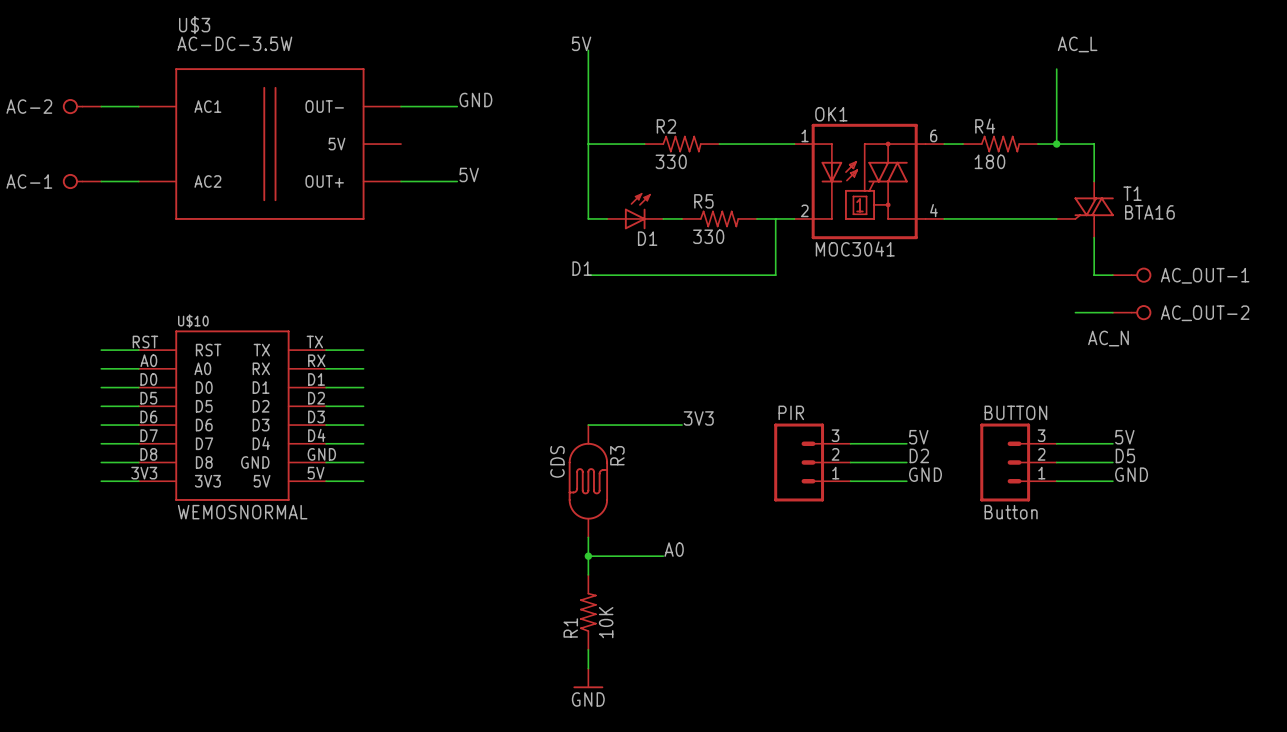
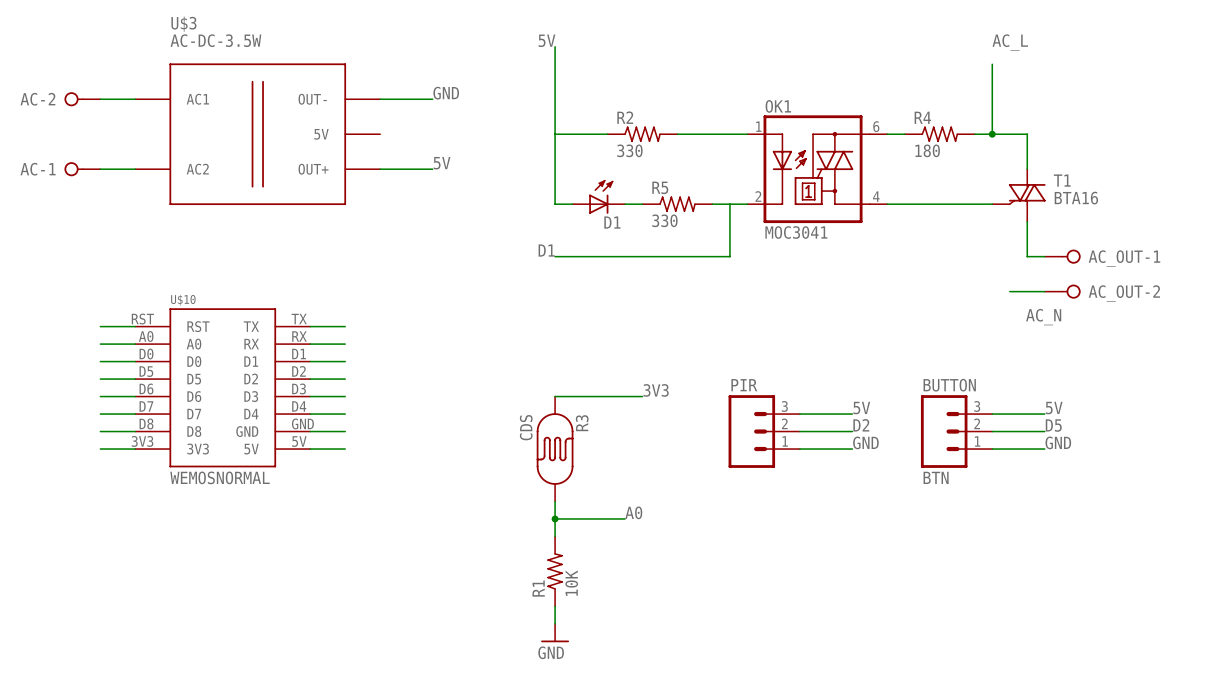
BUTTON value: Button (1011, 512) -> BTN (936, 477)

